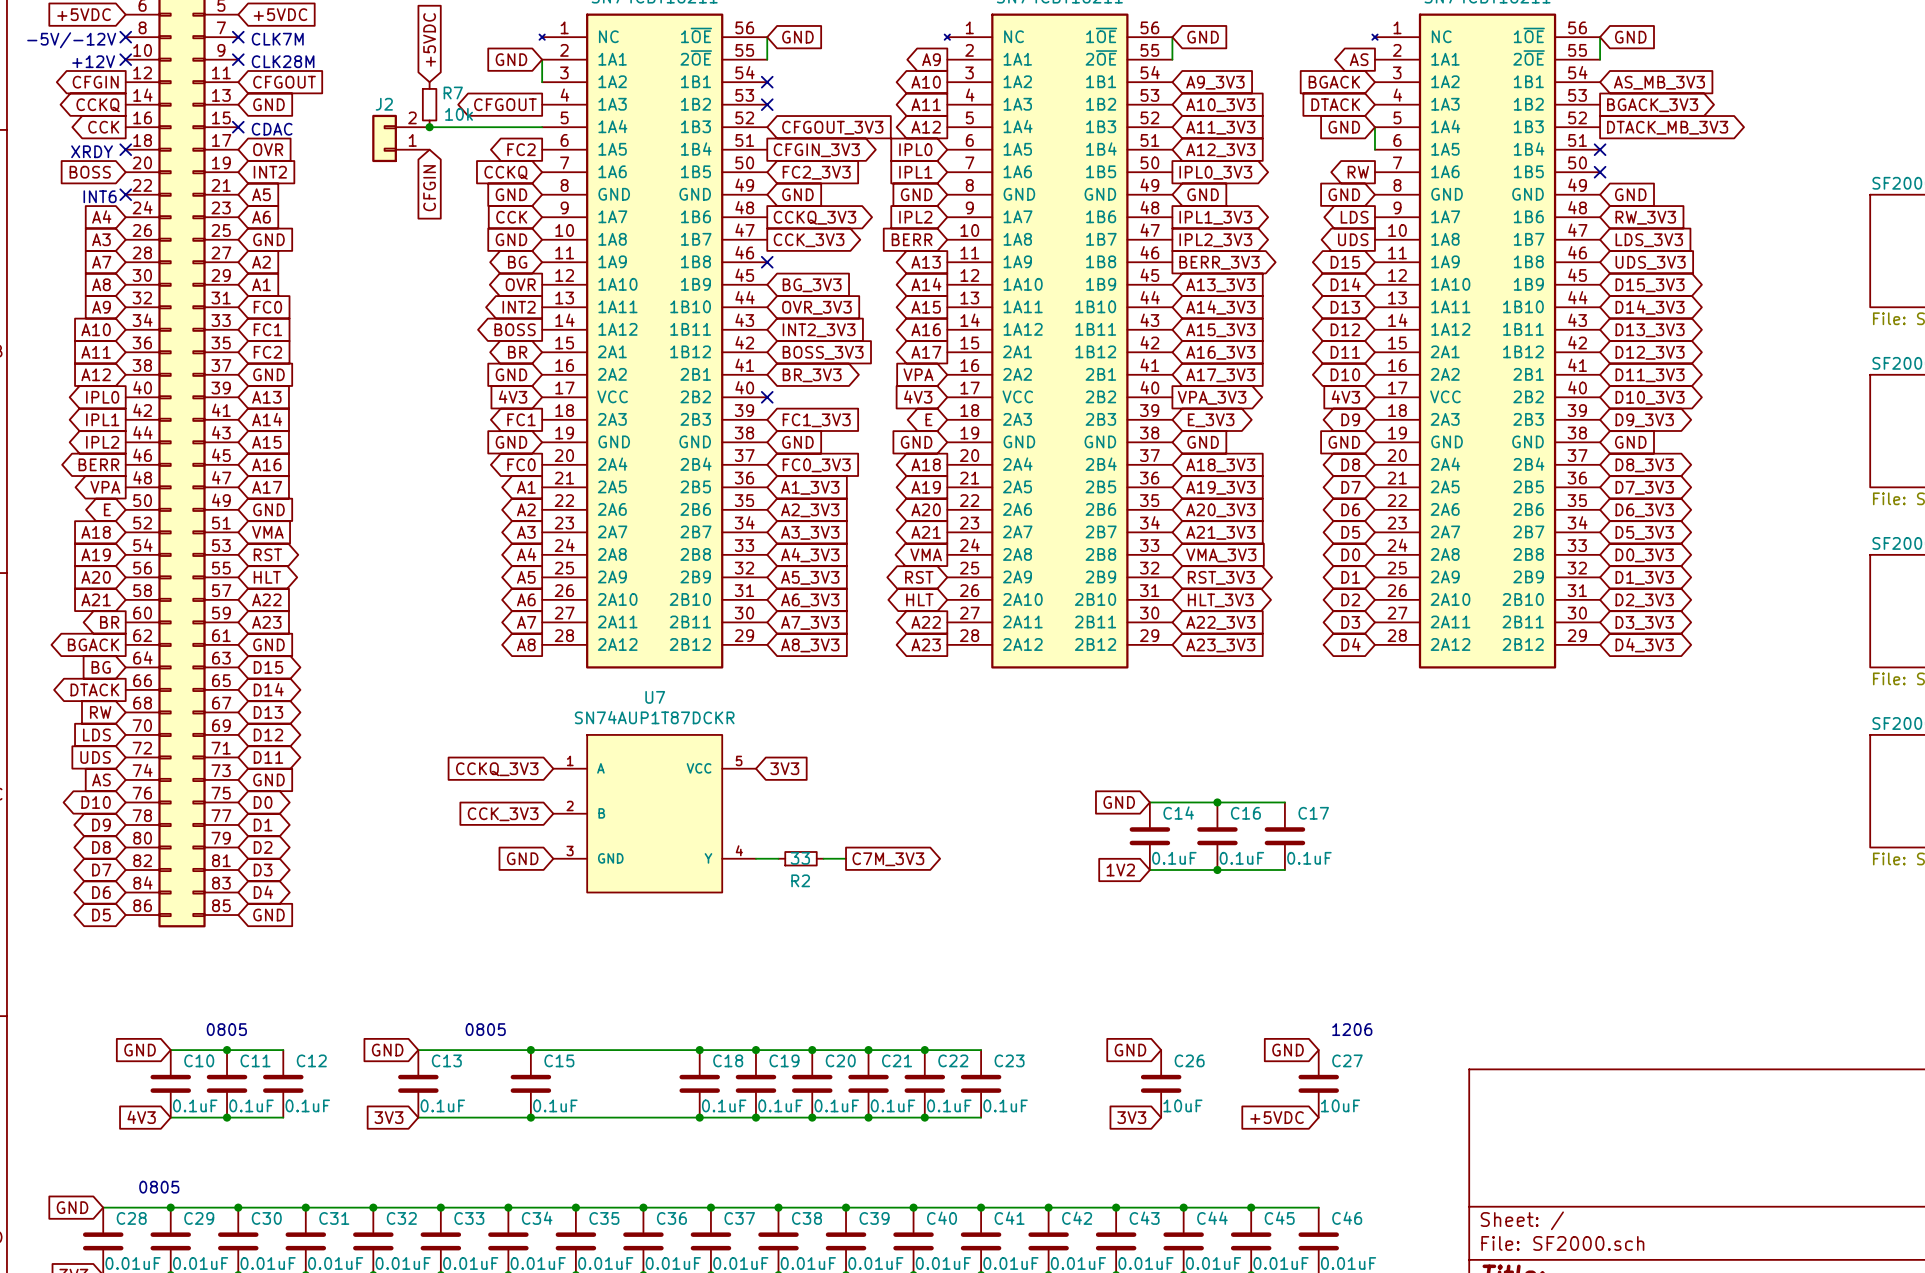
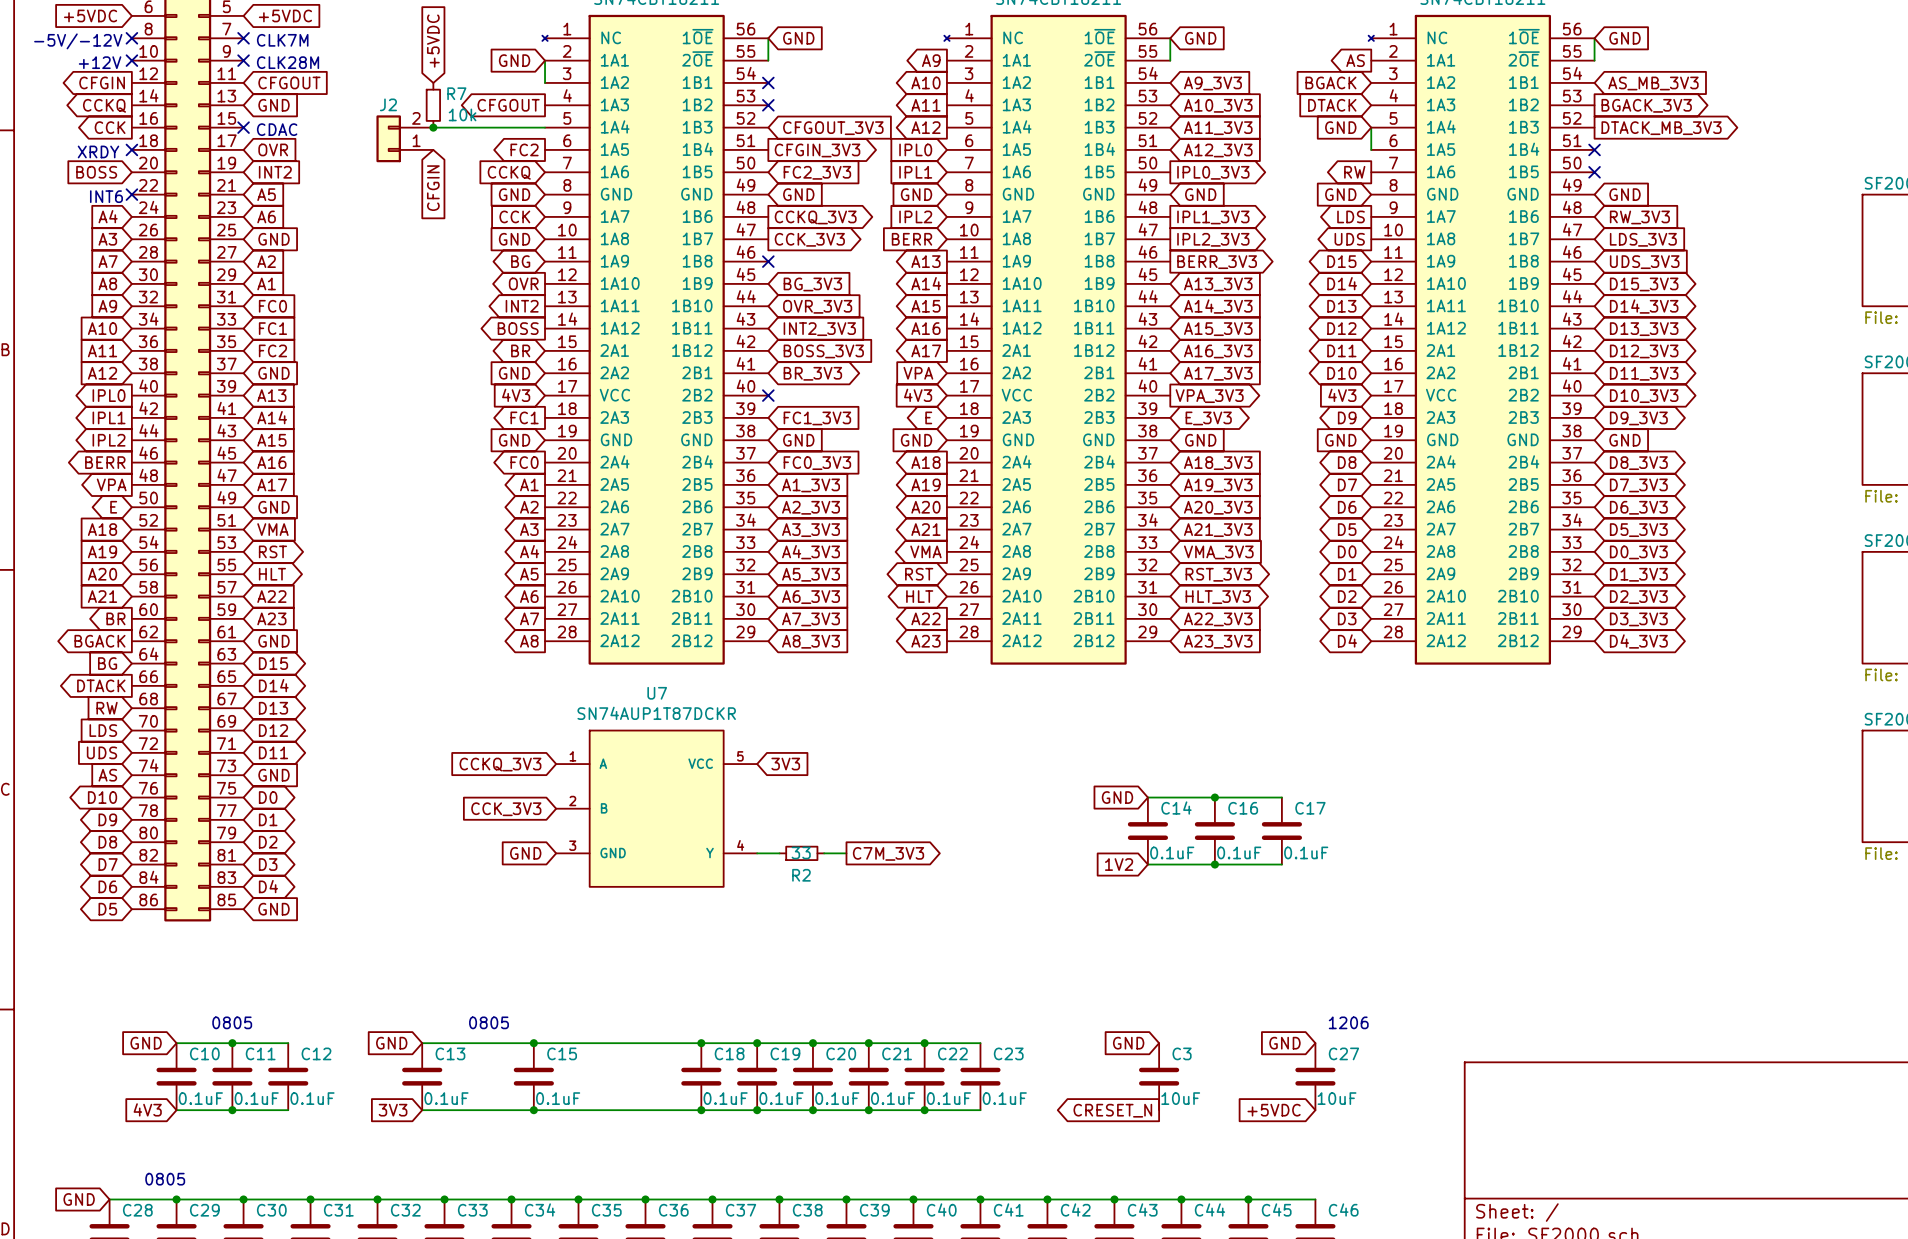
C26 name: C26 (1189, 1060) -> C3 (1182, 1053)
global label shape: input (1131, 1117) -> output (1112, 1110)
global label: 3V3 (1131, 1117) -> CRESET_N (1112, 1110)

